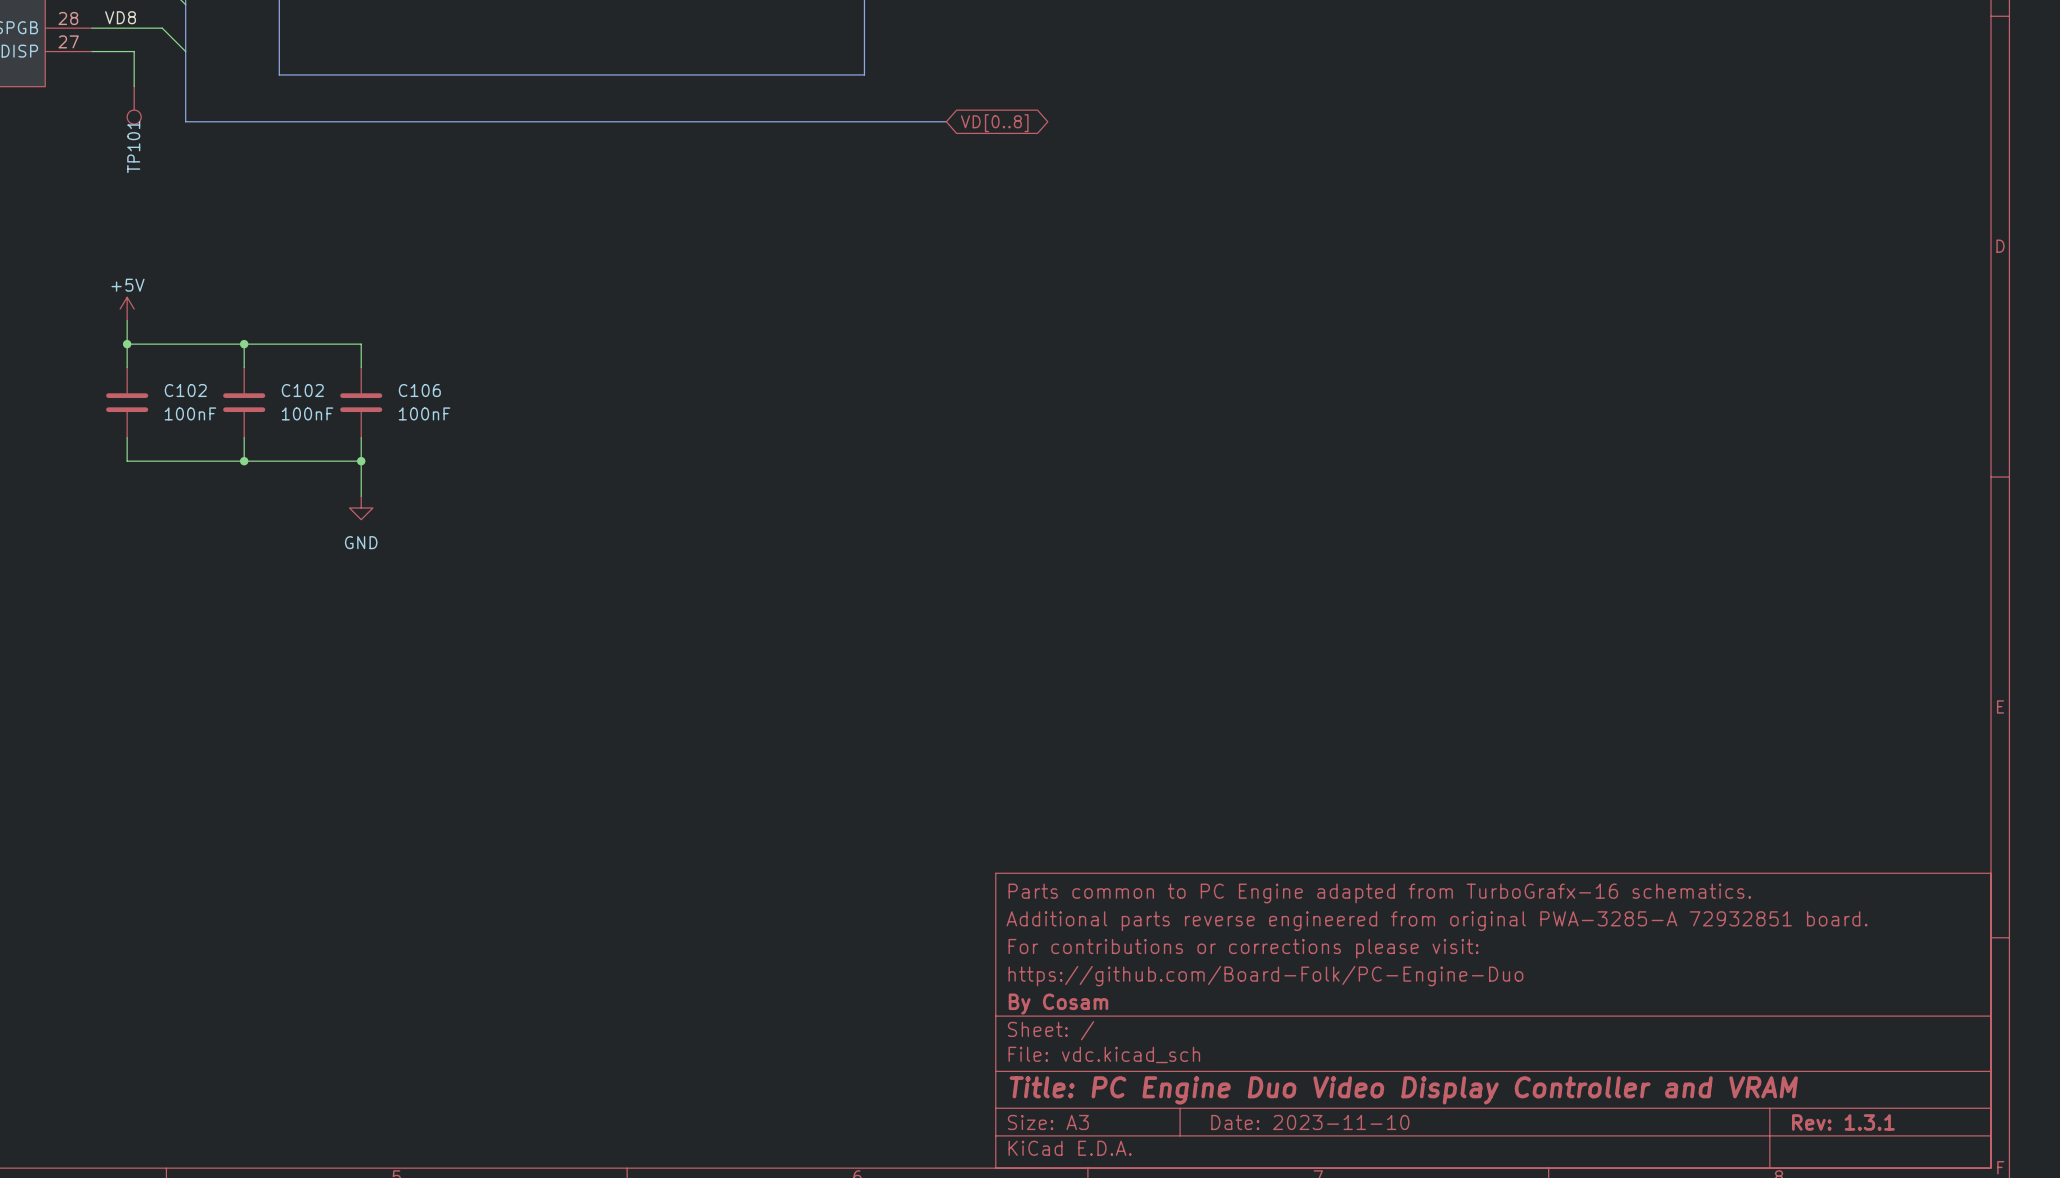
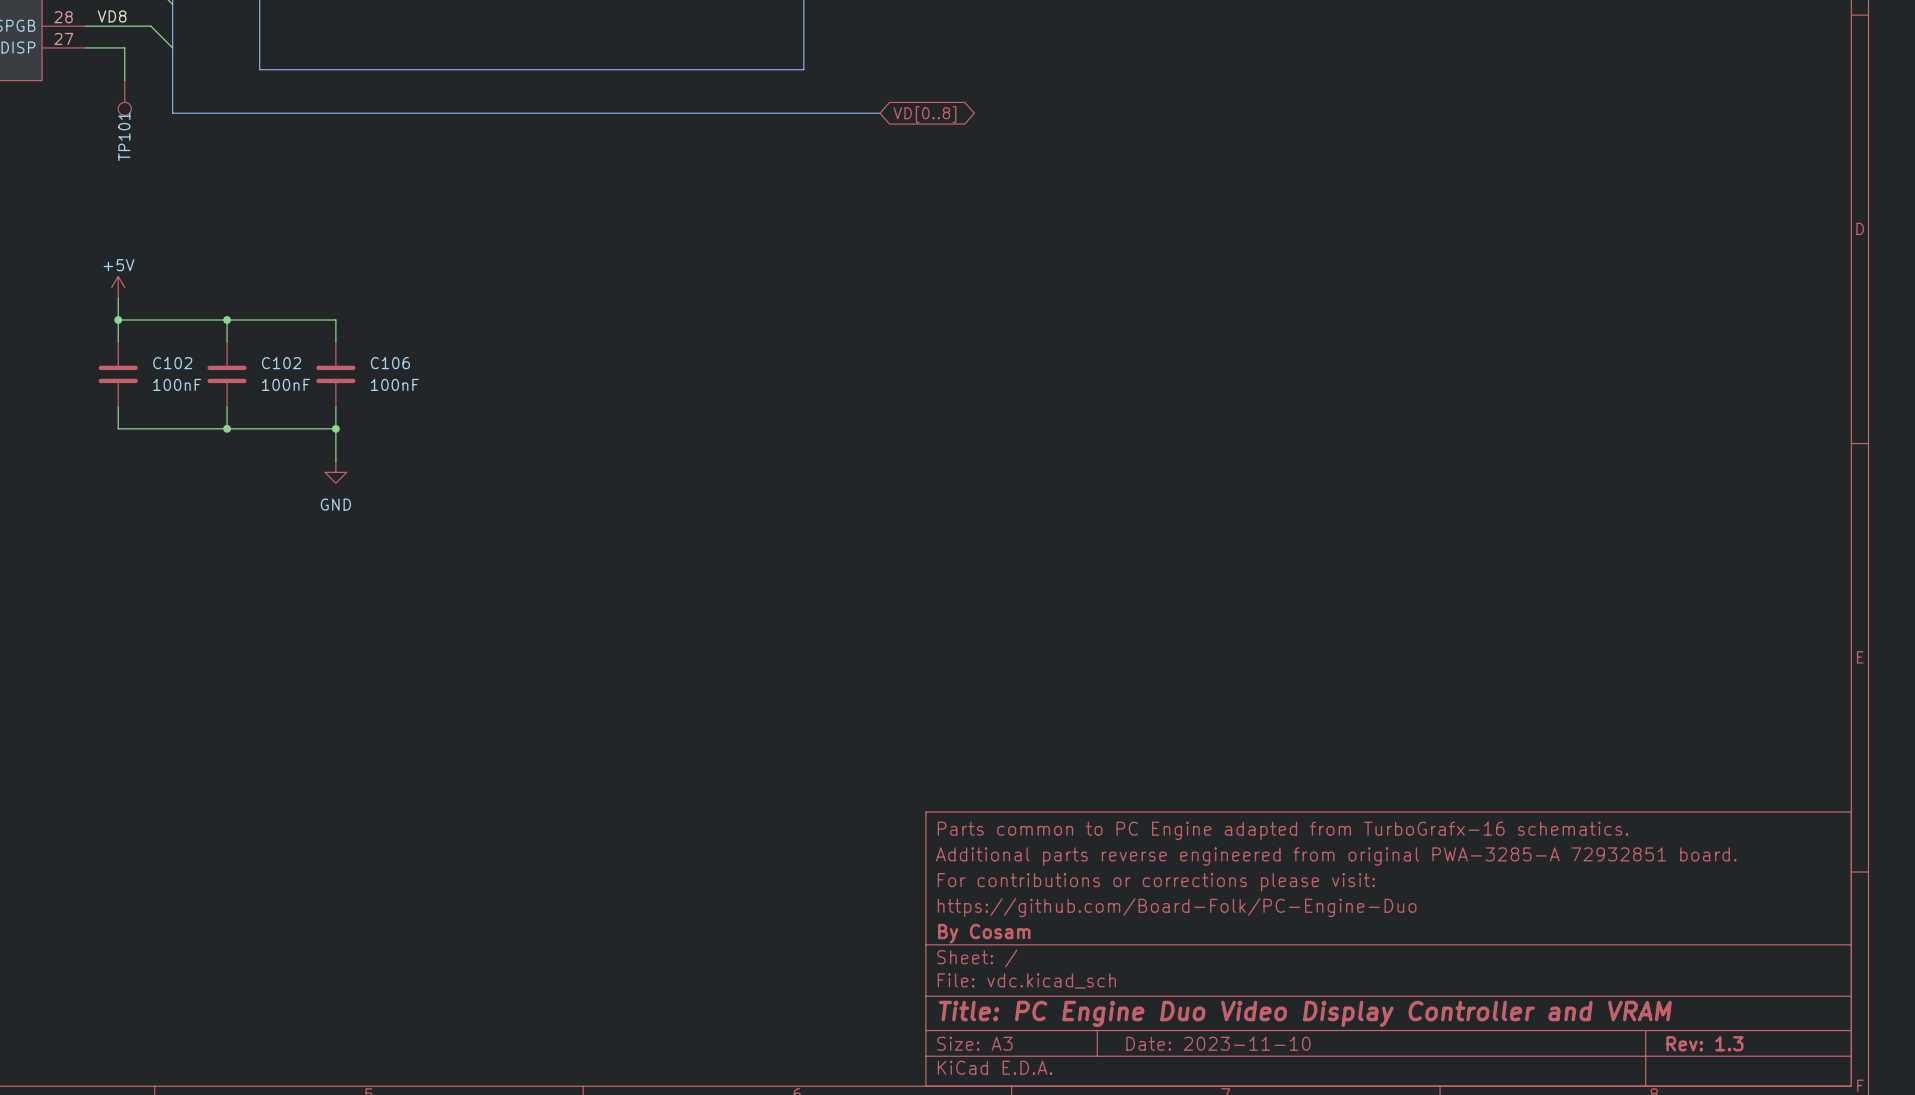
title block: Rev: 1.3.1 (1843, 1122) -> Rev: 1.3 (1704, 1043)

